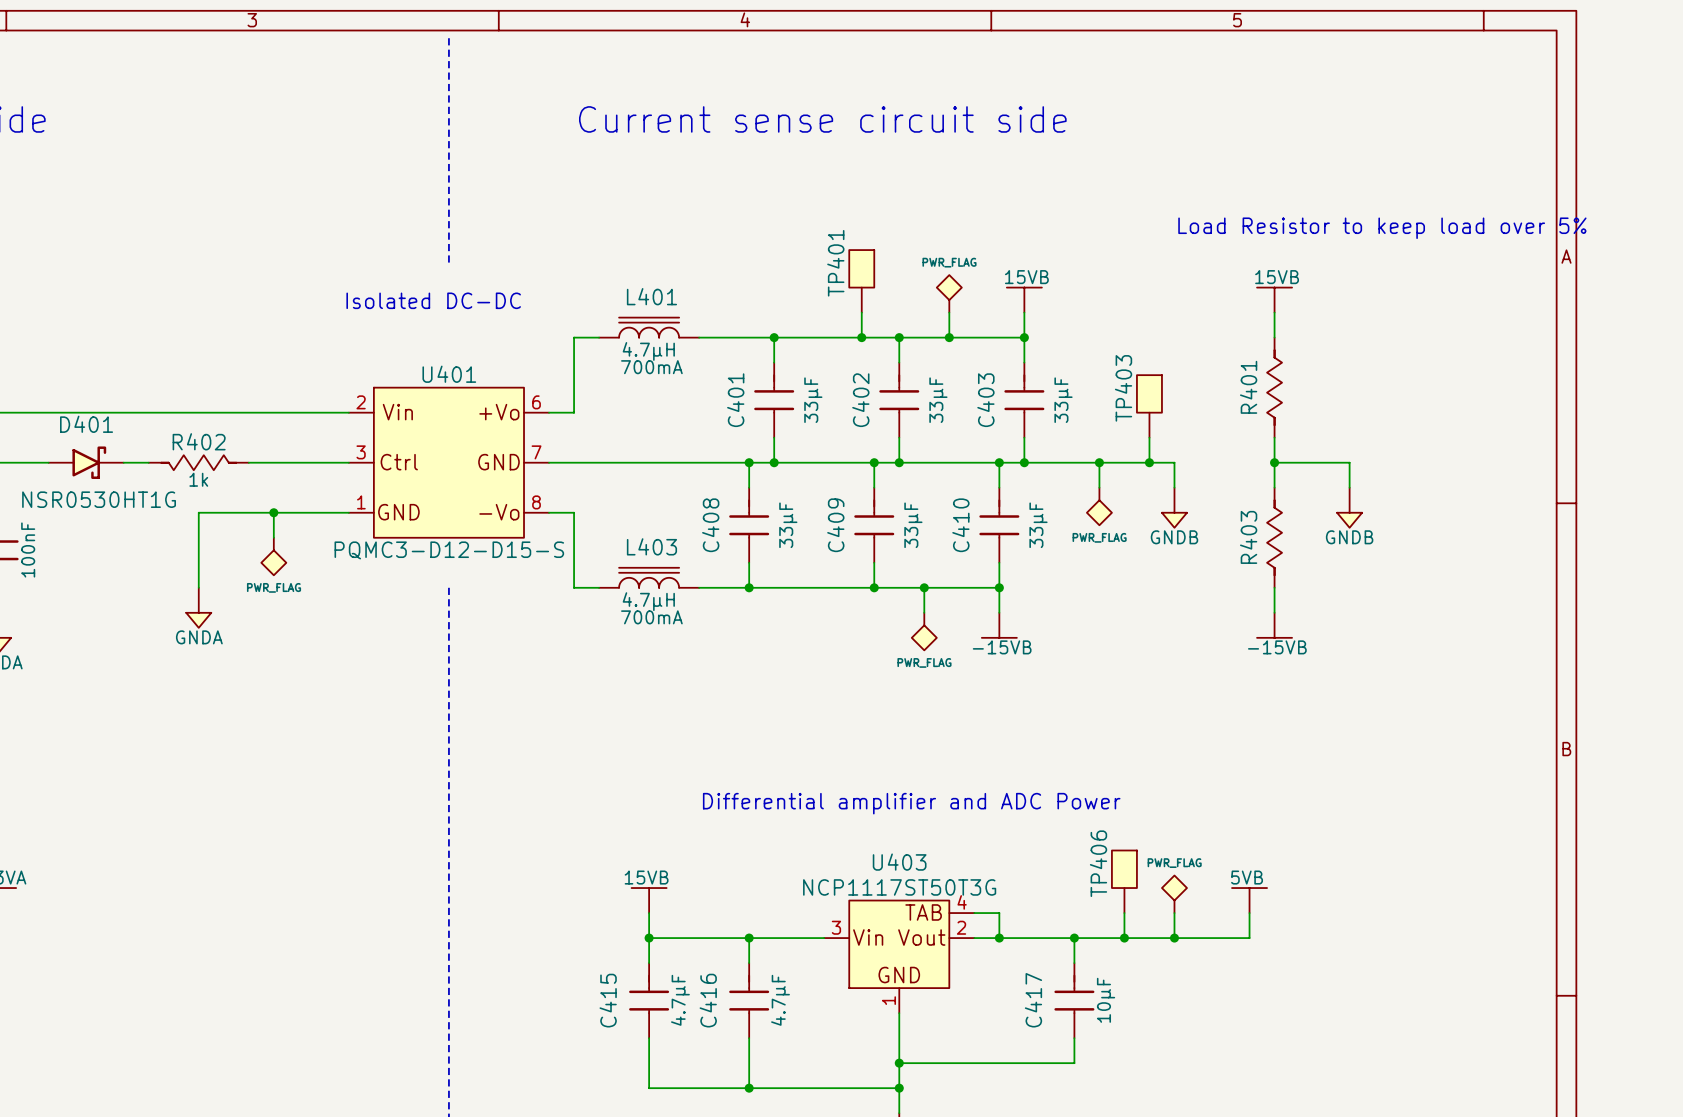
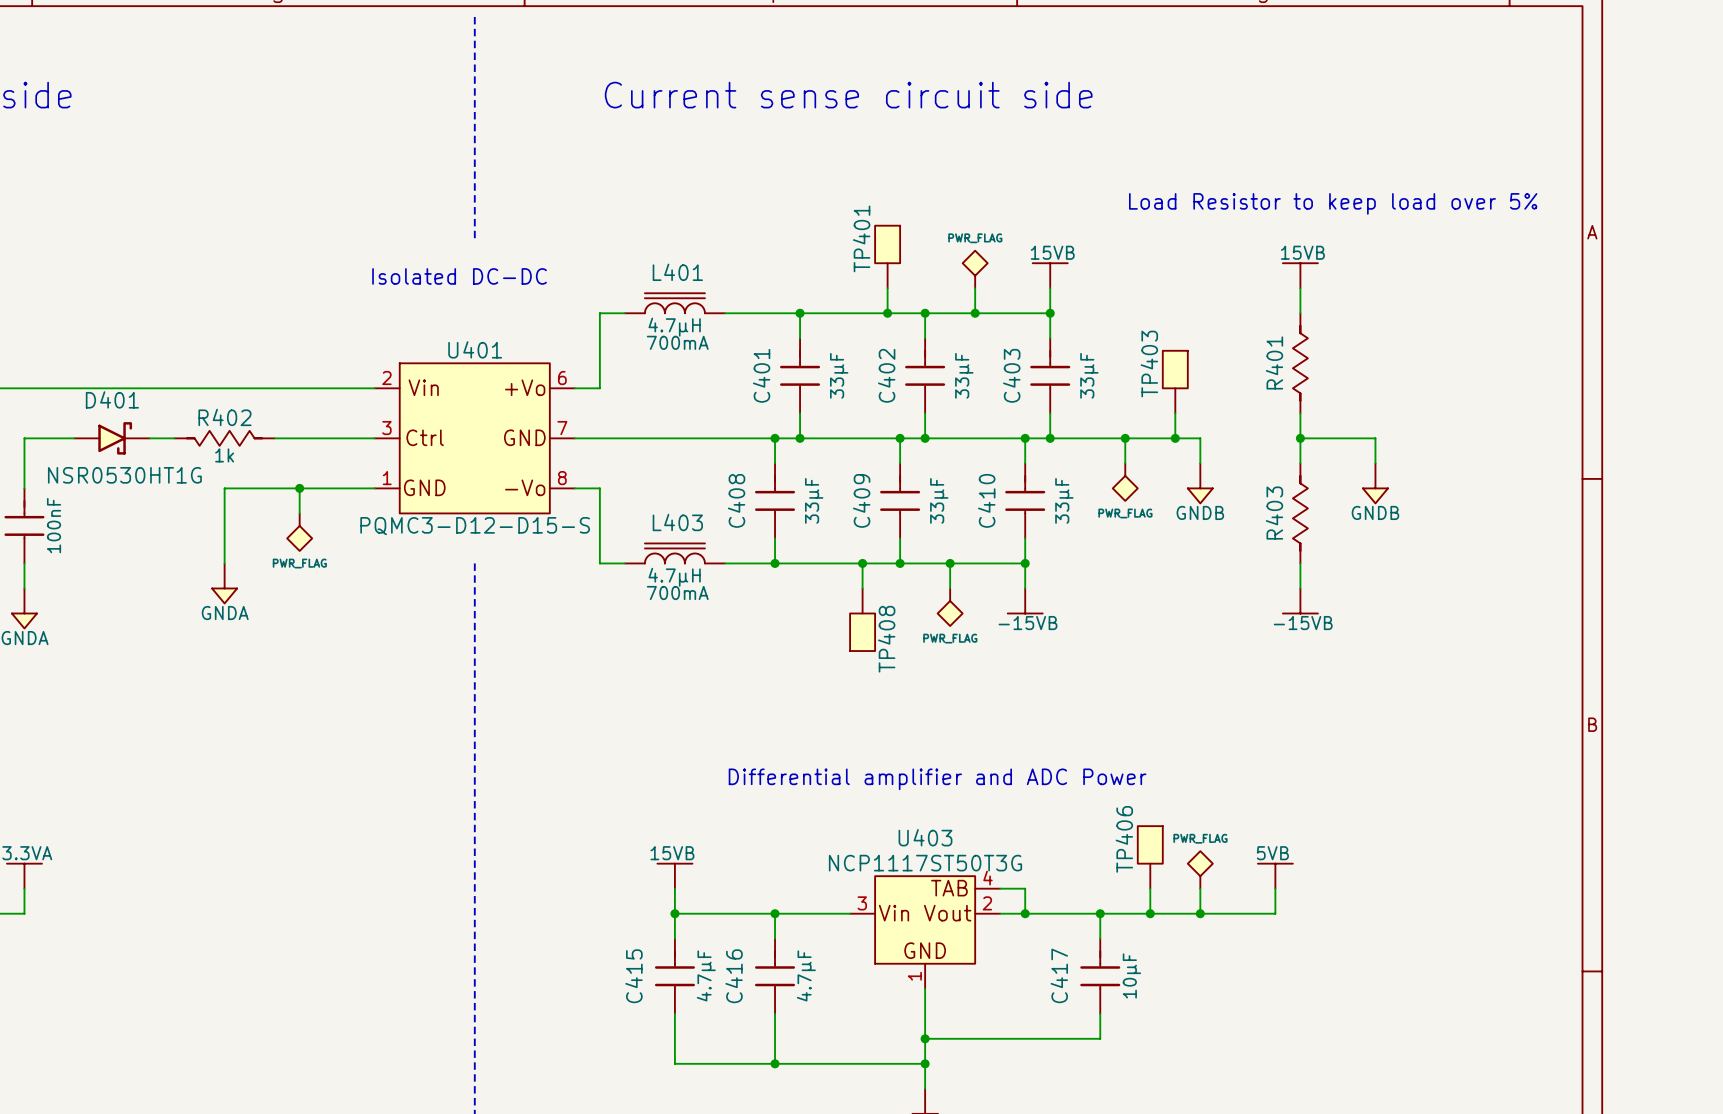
text position: Load Resistor to keep load over 5% (1382, 228) -> Load Resistor to keep load over 5% (1333, 203)
wire: none -> (862, 563) (862, 588)
junction: none -> (862, 563)
TP408: none -> (862, 619)

